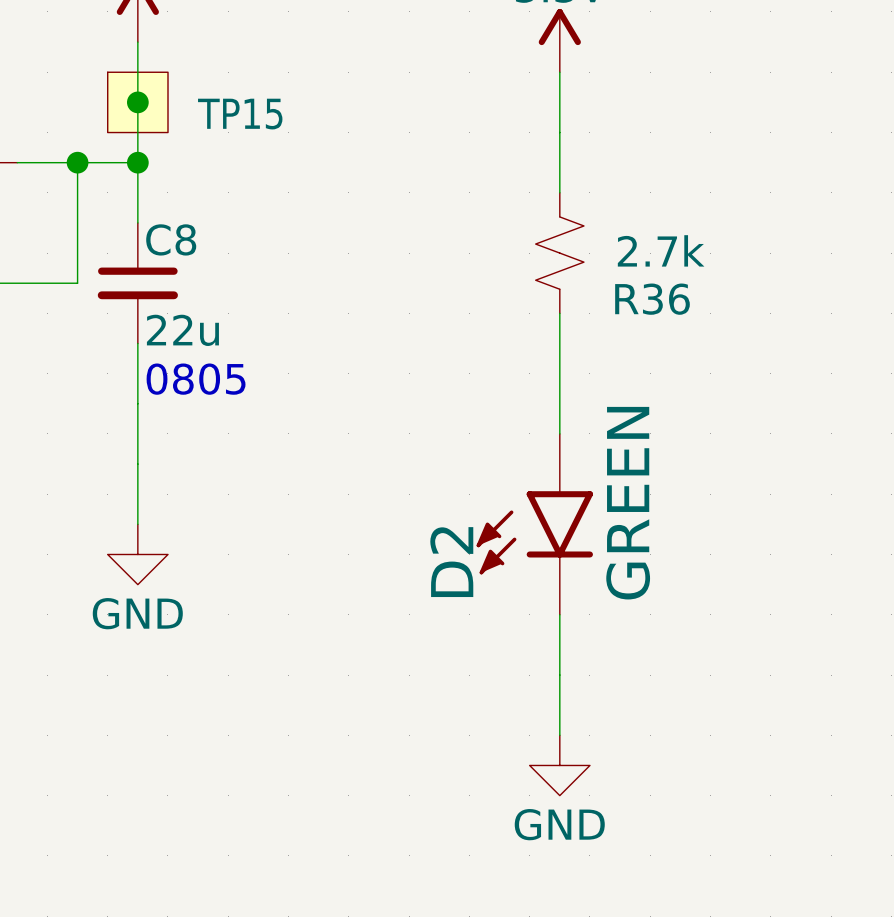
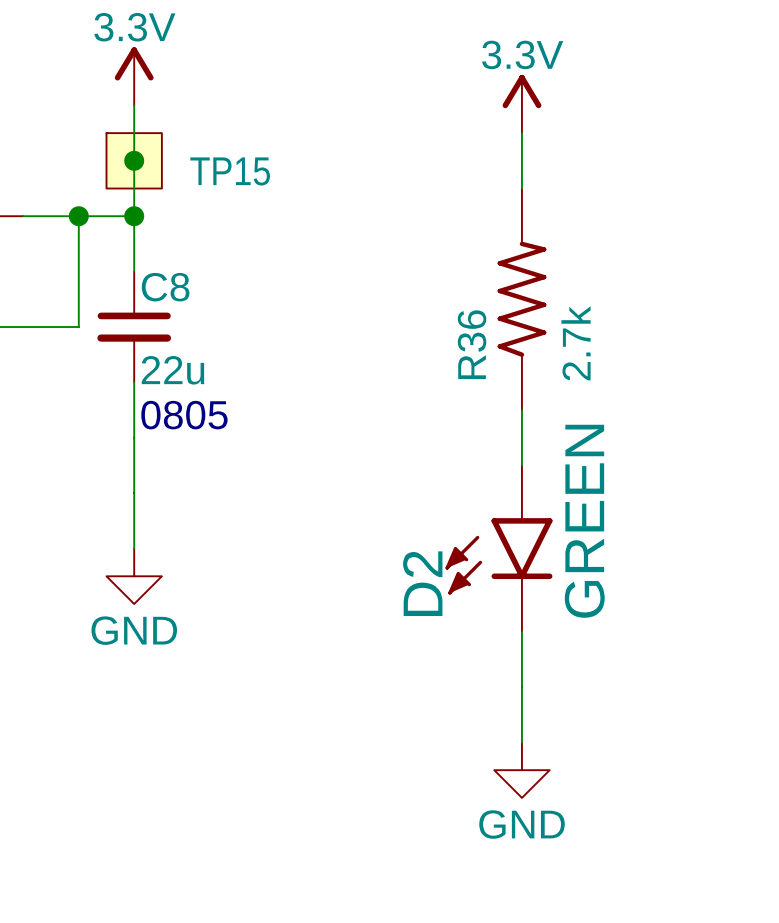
R36 symbol: [535, 192, 584, 314] -> [497, 188, 547, 411]
R36 name position: R36 (652, 299) -> R36 (472, 344)

